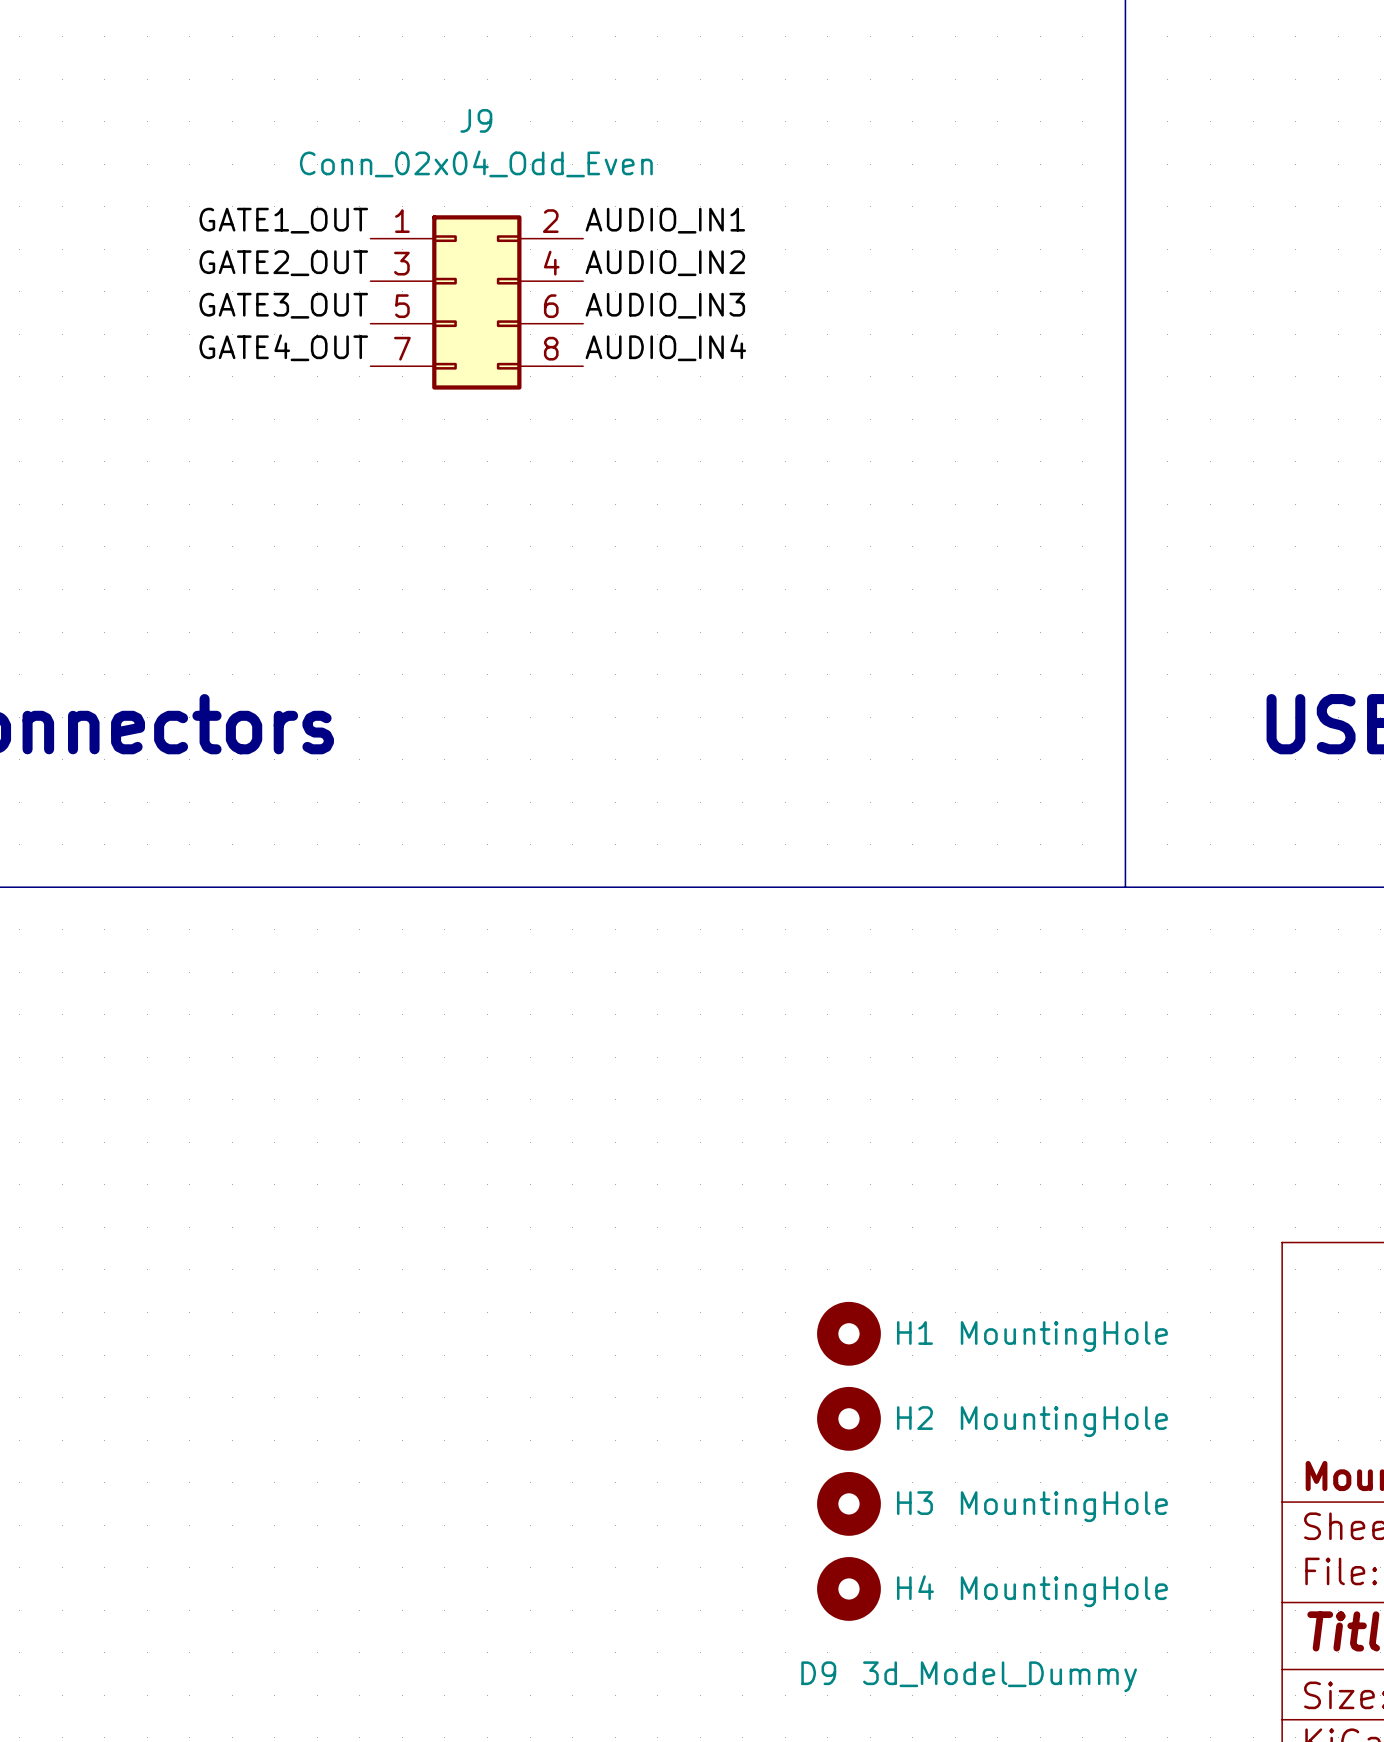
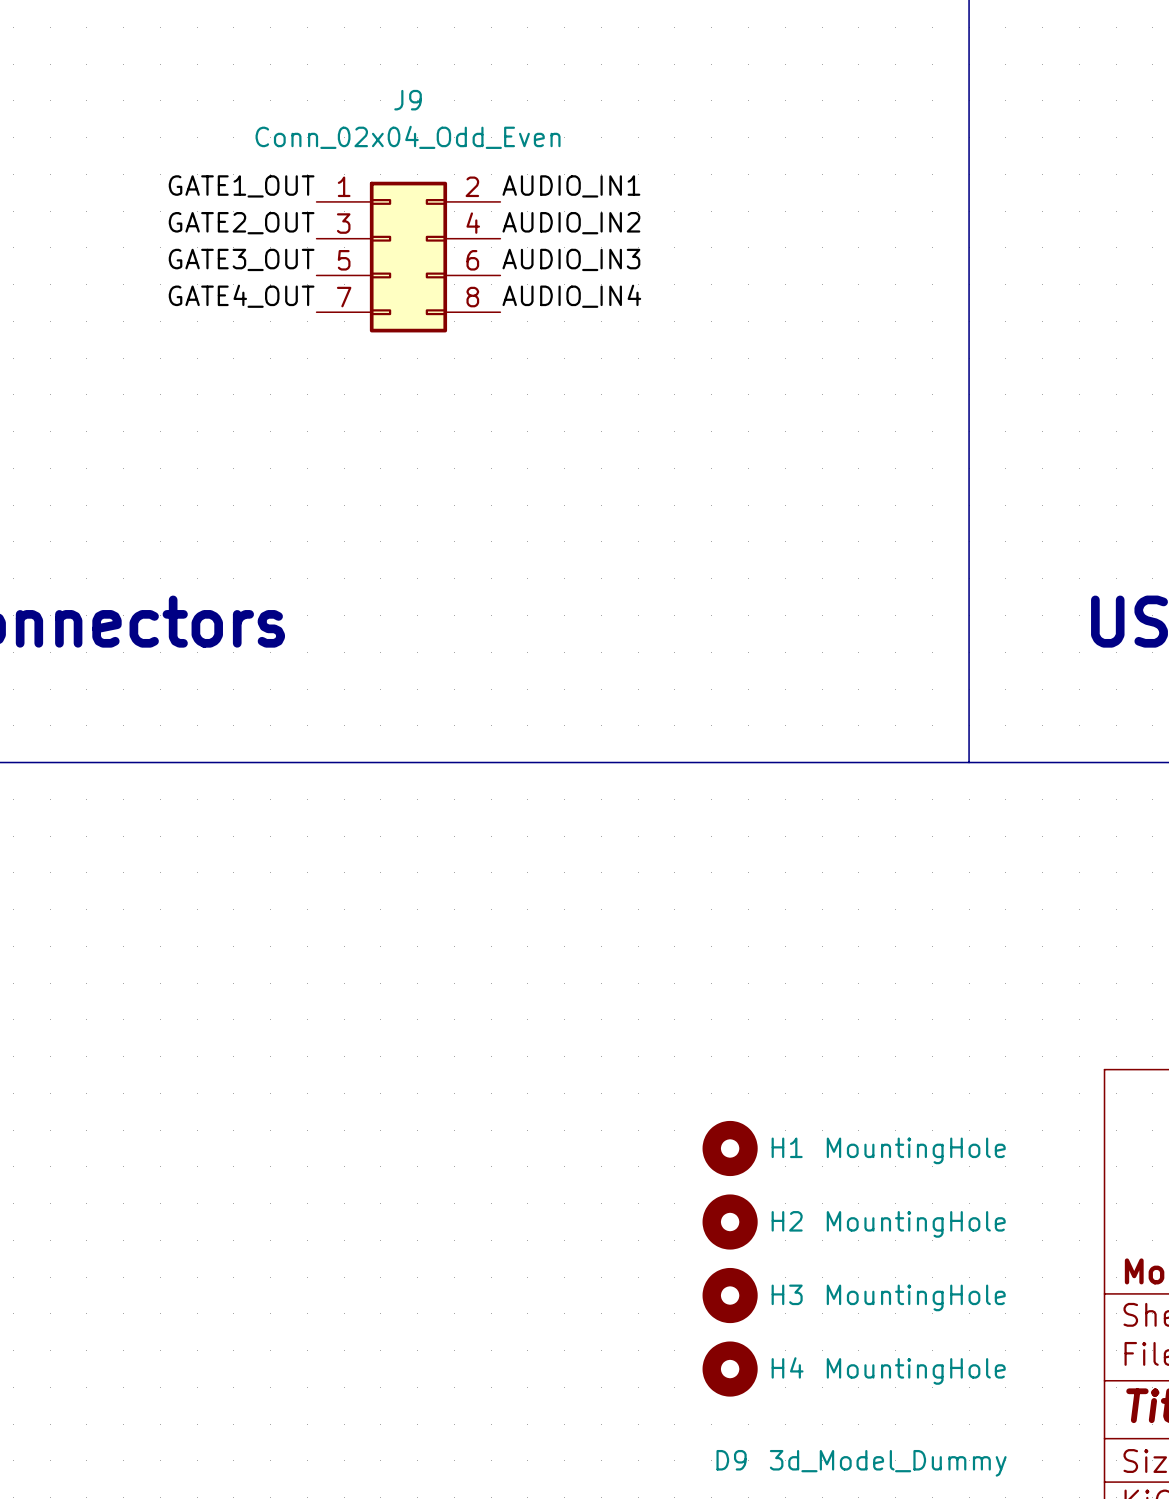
D9 position: (969, 1676) -> (861, 1463)

